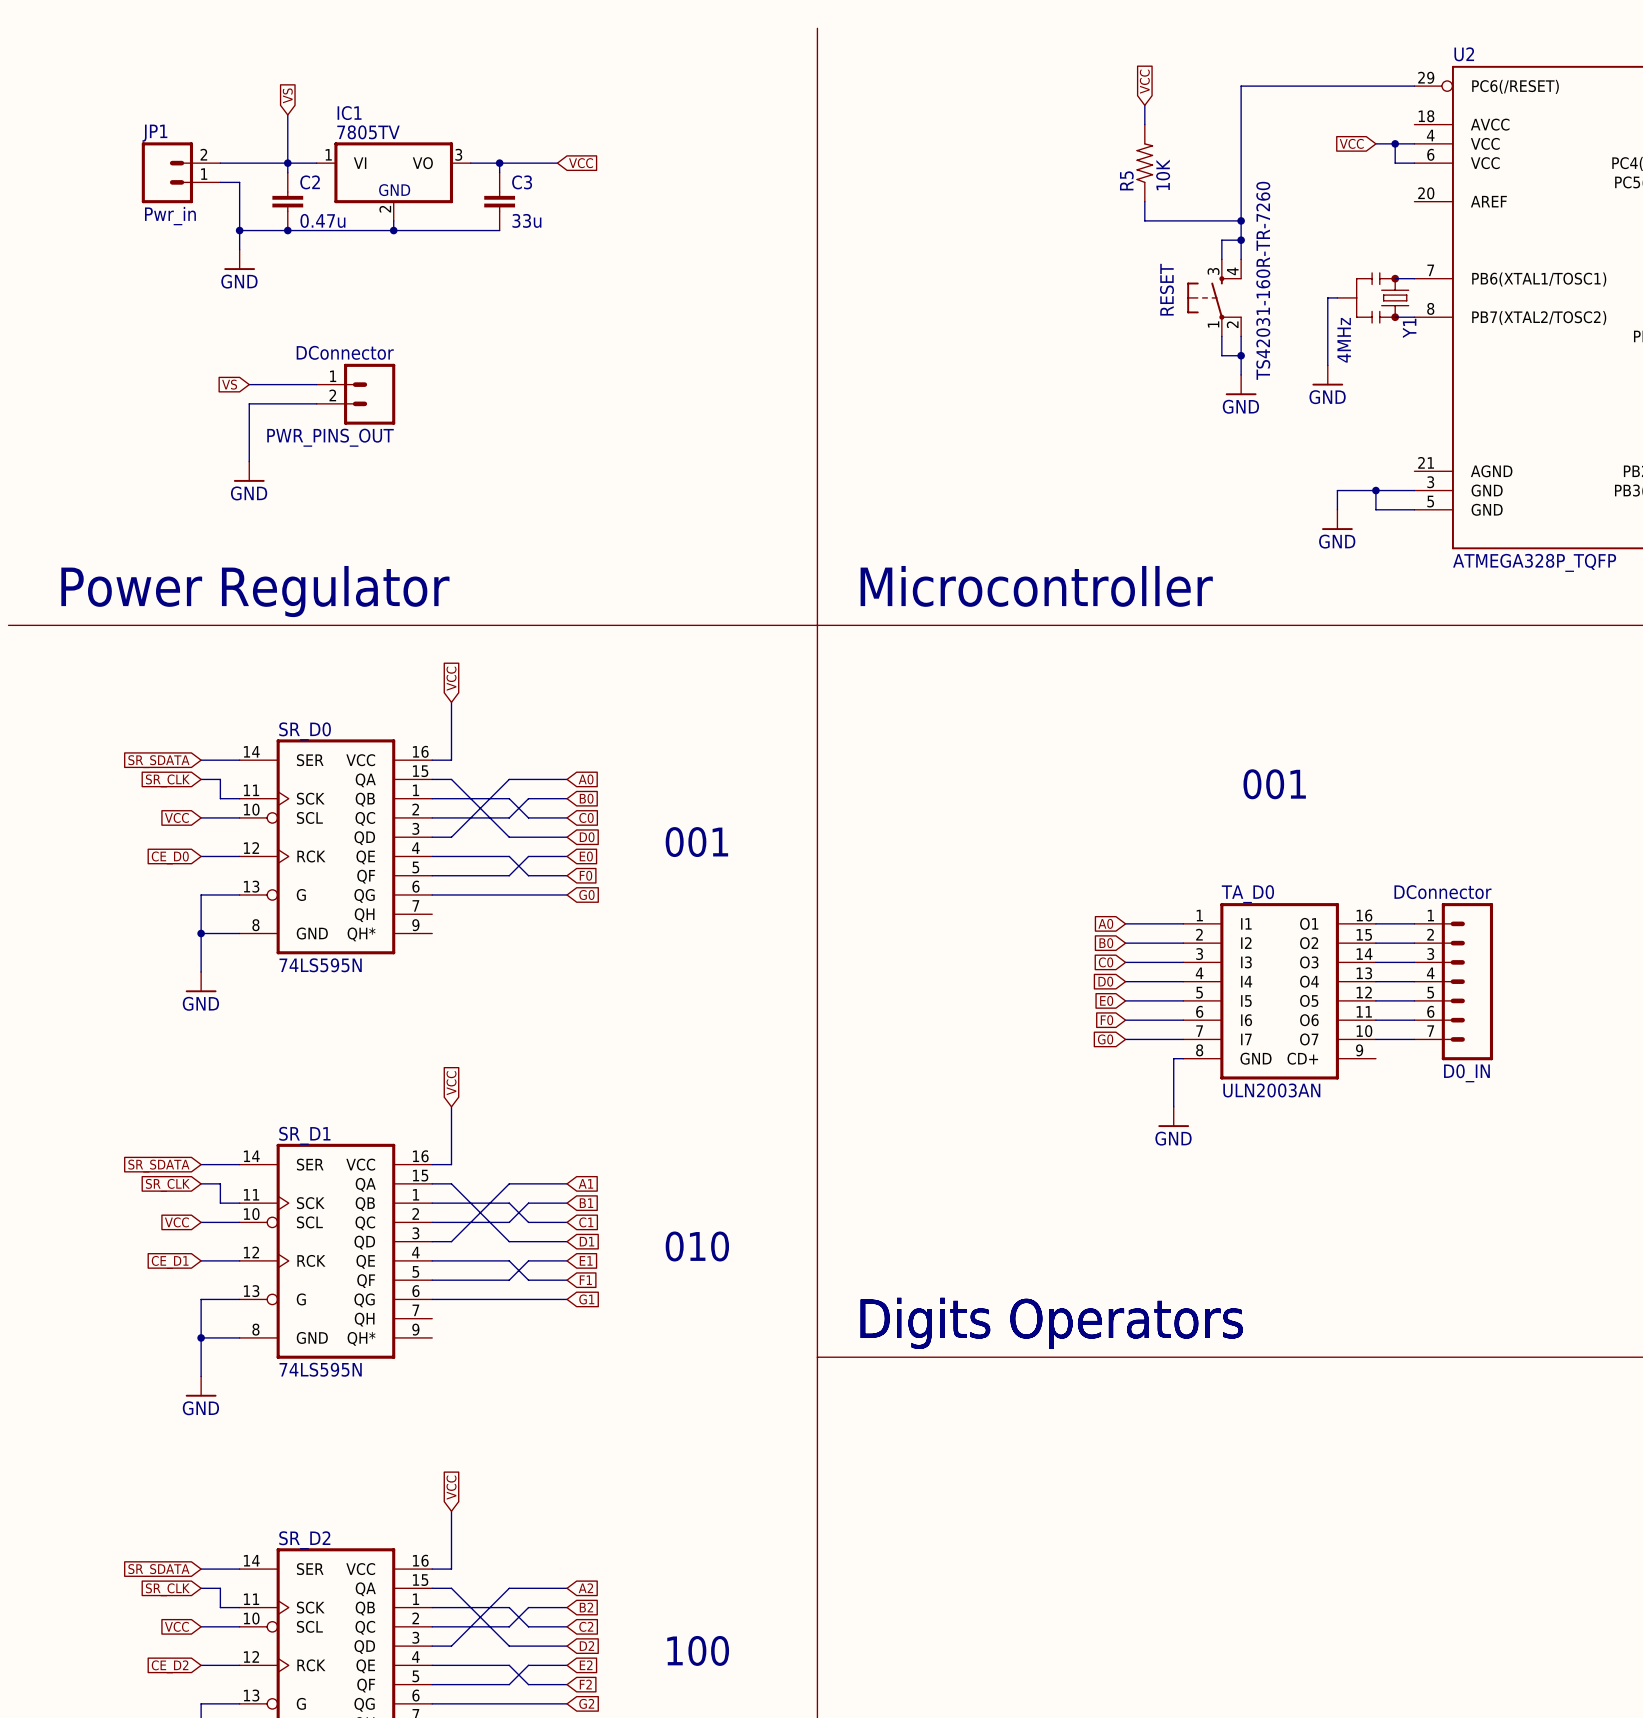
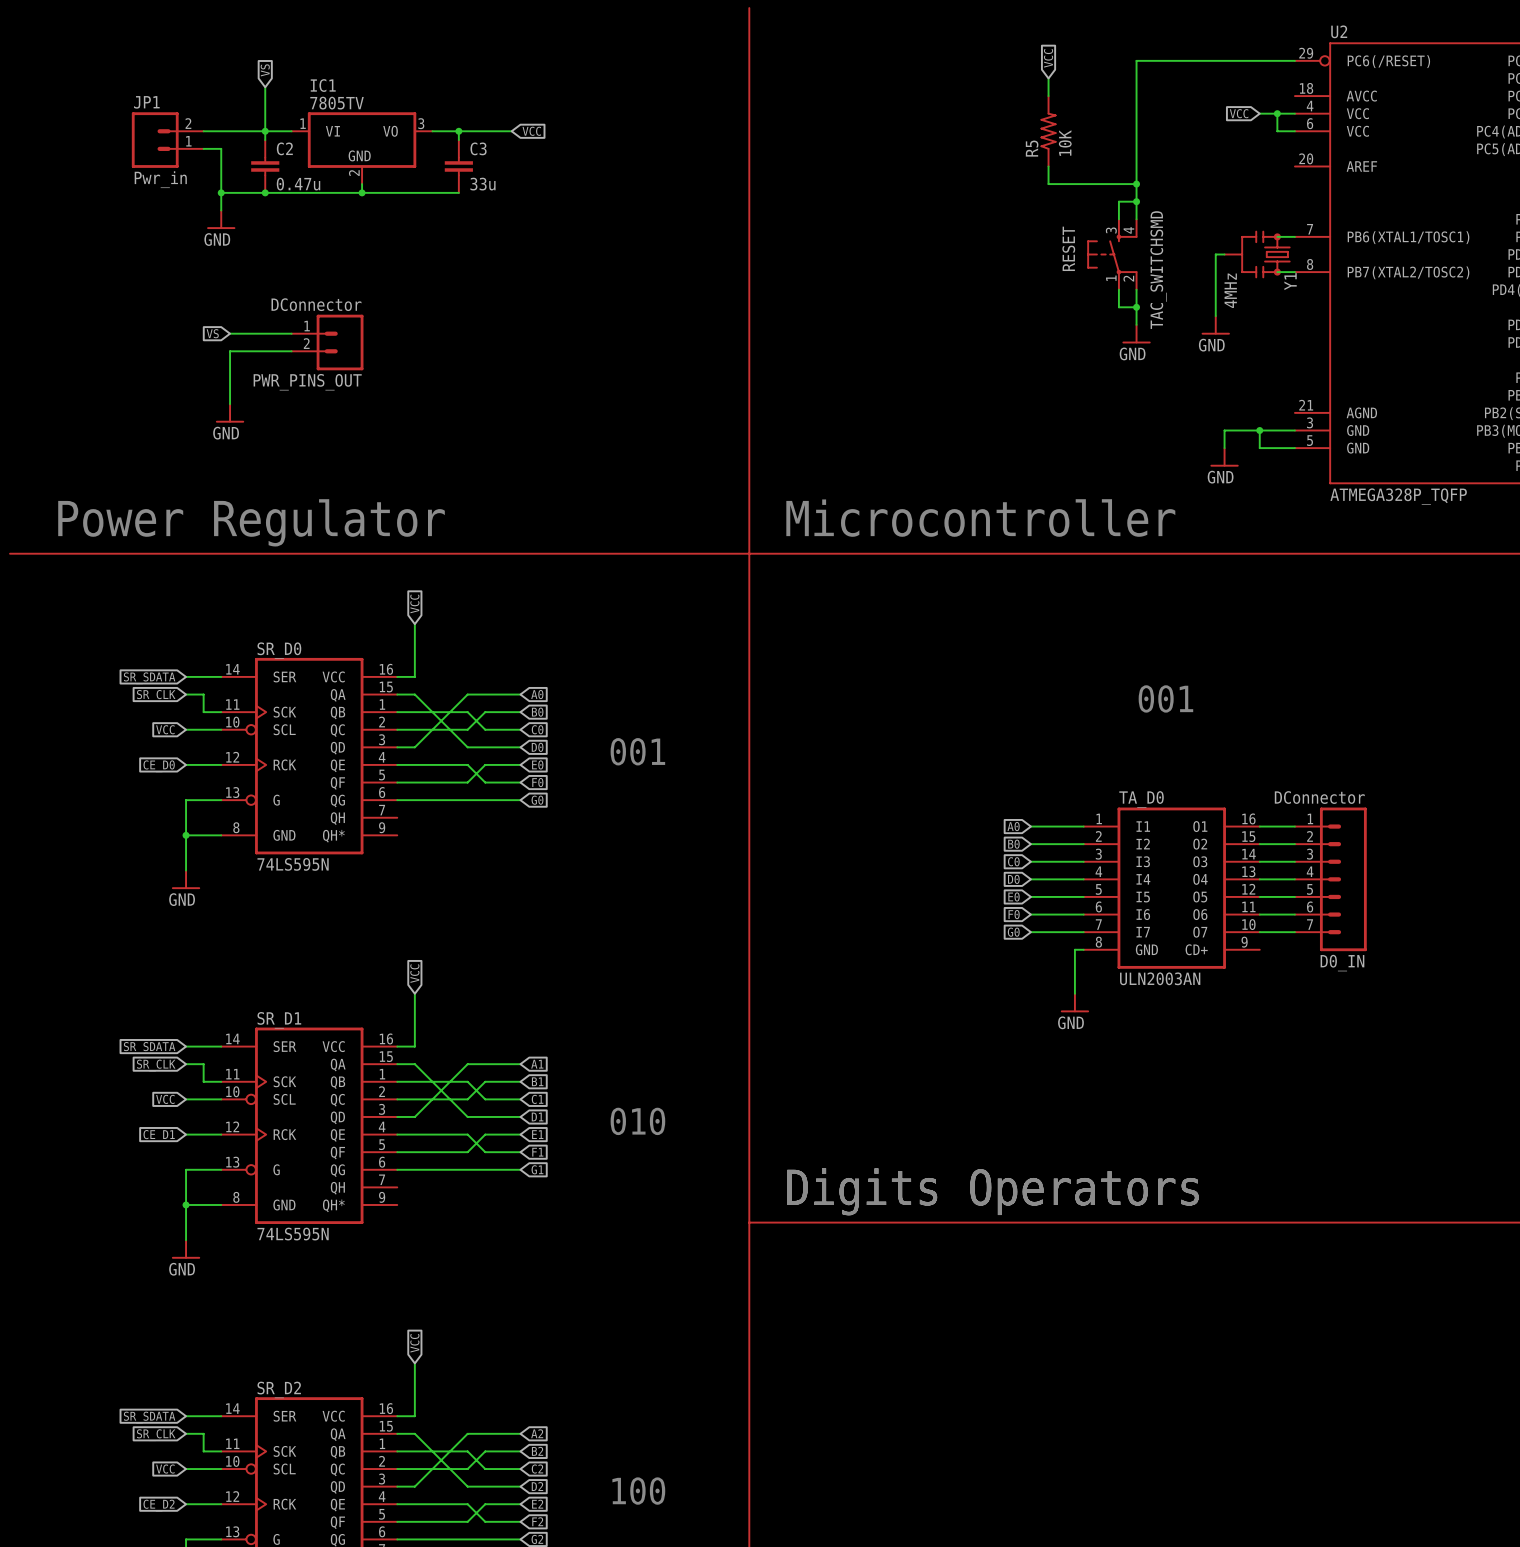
RESET value: TS42031-160R-TR-7260 (1263, 280) -> TAC_SWITCHSMD (1158, 270)

